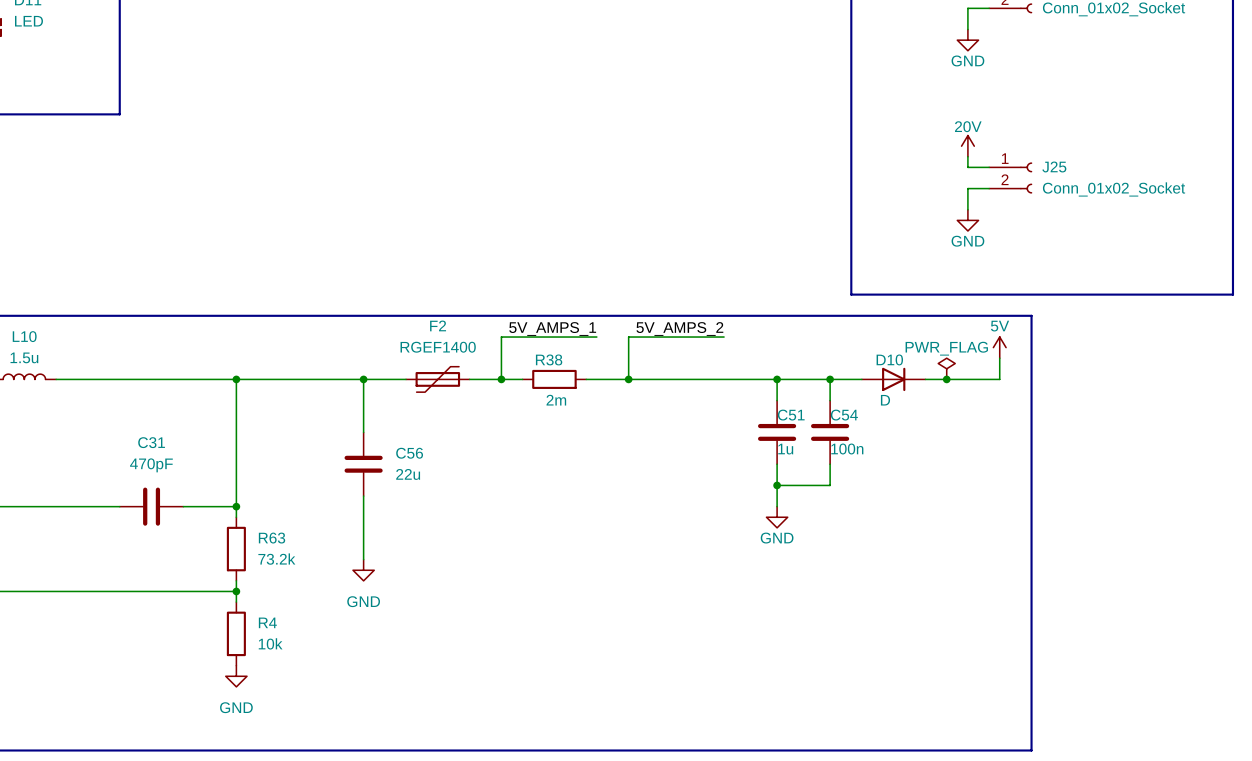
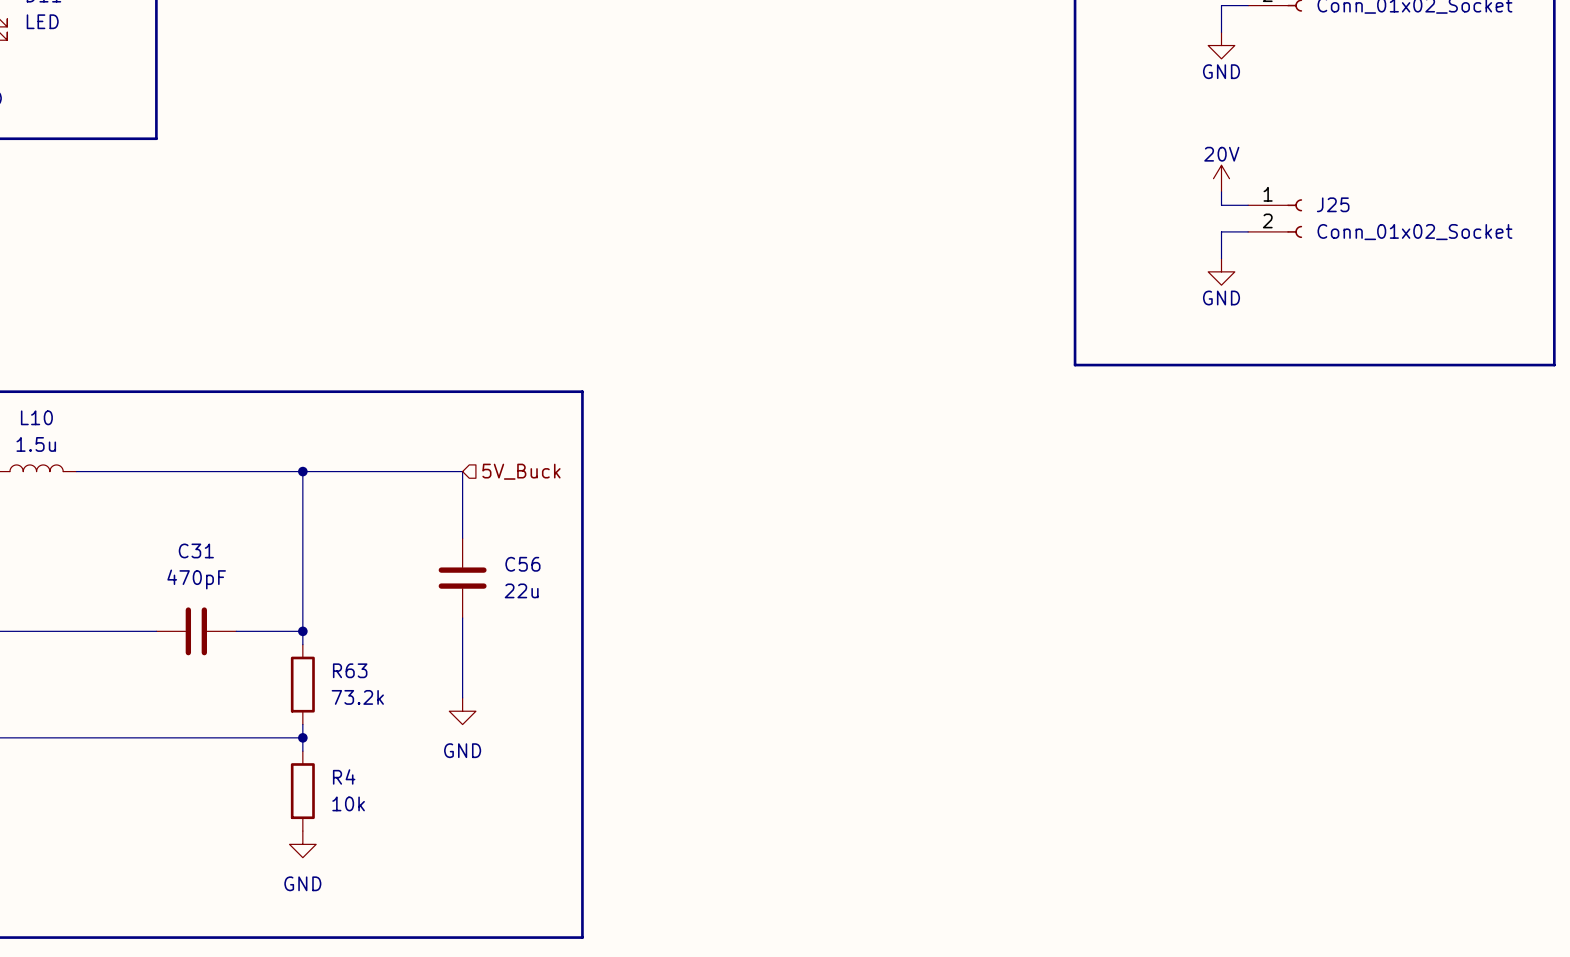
line: (459, 315) (1031, 315) (1031, 750) (459, 750) -> (582, 391) (582, 937)
label: 5V_AMPS_1 (552, 329) -> none
label: 5V_AMPS_2 (679, 329) -> none
wire: (596, 337) (501, 337) (501, 379) -> none
wire: (724, 337) (628, 337) (628, 379) -> none
power symbol: 5V (999, 347) -> none
wire: (999, 358) (999, 379) (925, 379) -> none
power symbol: PWR_FLAG (946, 368) -> none
wire: (363, 379) (406, 379) -> none
junction: (363, 379) -> none
F2: RGEF1400 (437, 379) -> none
wire: (469, 379) (522, 379) -> none
junction: (501, 379) -> none
R38: 2m (554, 379) -> none
wire: (586, 379) (861, 379) -> none
junction: (628, 379) -> none
wire: (777, 379) (777, 400) -> none
junction: (777, 379) -> none
wire: (830, 379) (830, 400) -> none
junction: (830, 379) -> none
D10: D (893, 379) -> none
junction: (946, 379) -> none
hierarchical label: none -> 5V_Buck (521, 471)
C51: 1u (777, 432) -> none
C54: 100n (830, 432) -> none
wire: (777, 464) (777, 506) -> none
wire: (830, 464) (830, 485) (777, 485) -> none
junction: (777, 485) -> none
power symbol: GND (777, 517) -> none

